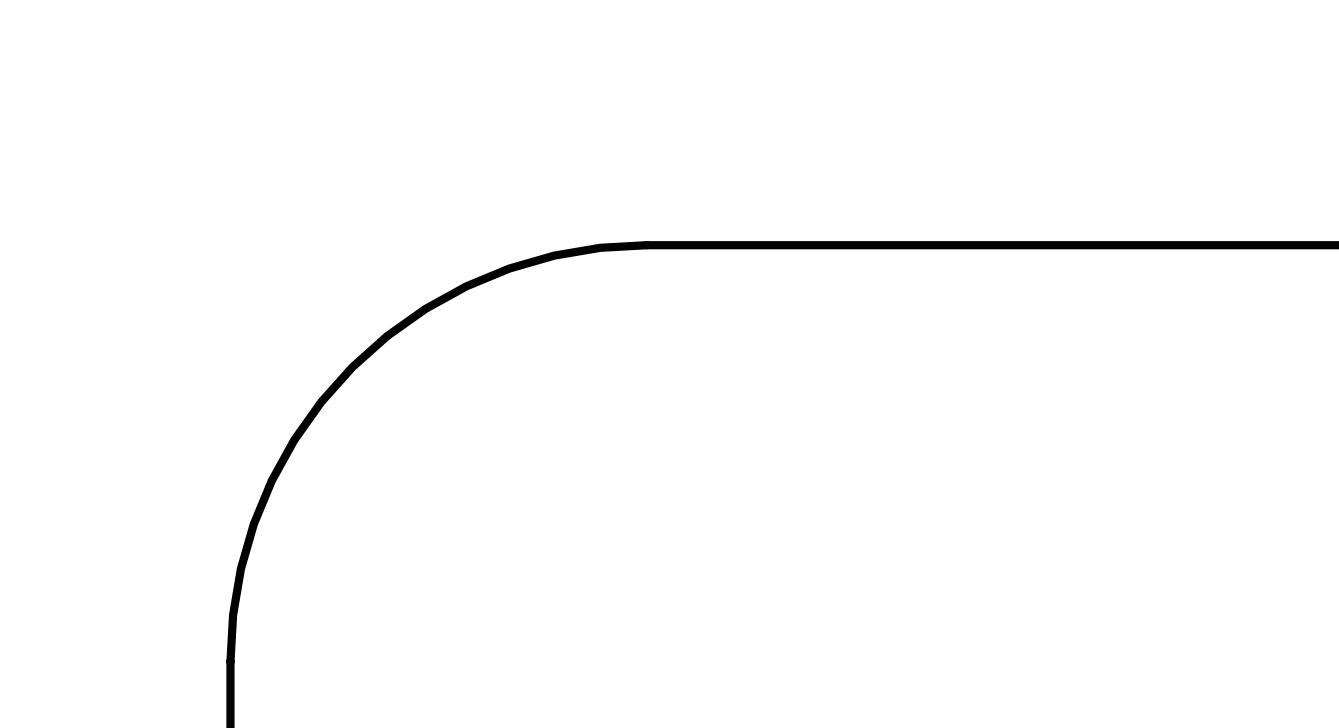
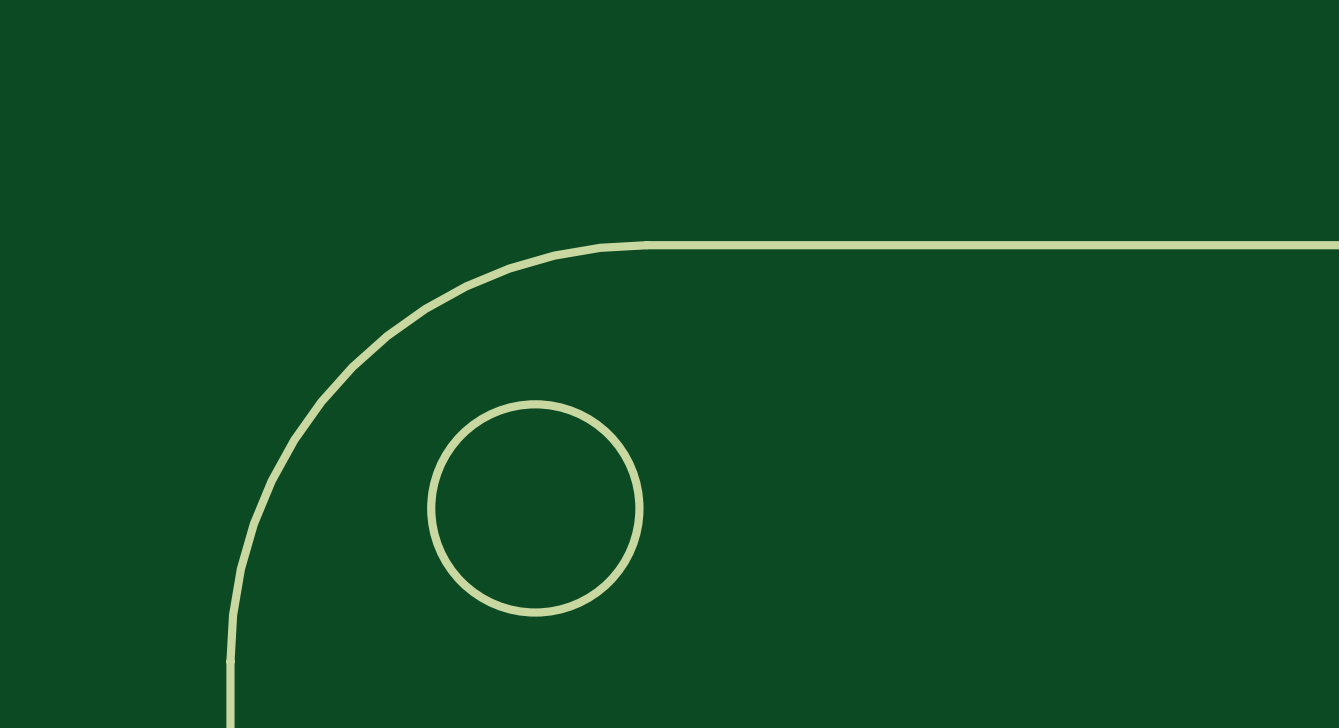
round board edge: none -> [427, 400, 644, 617]

